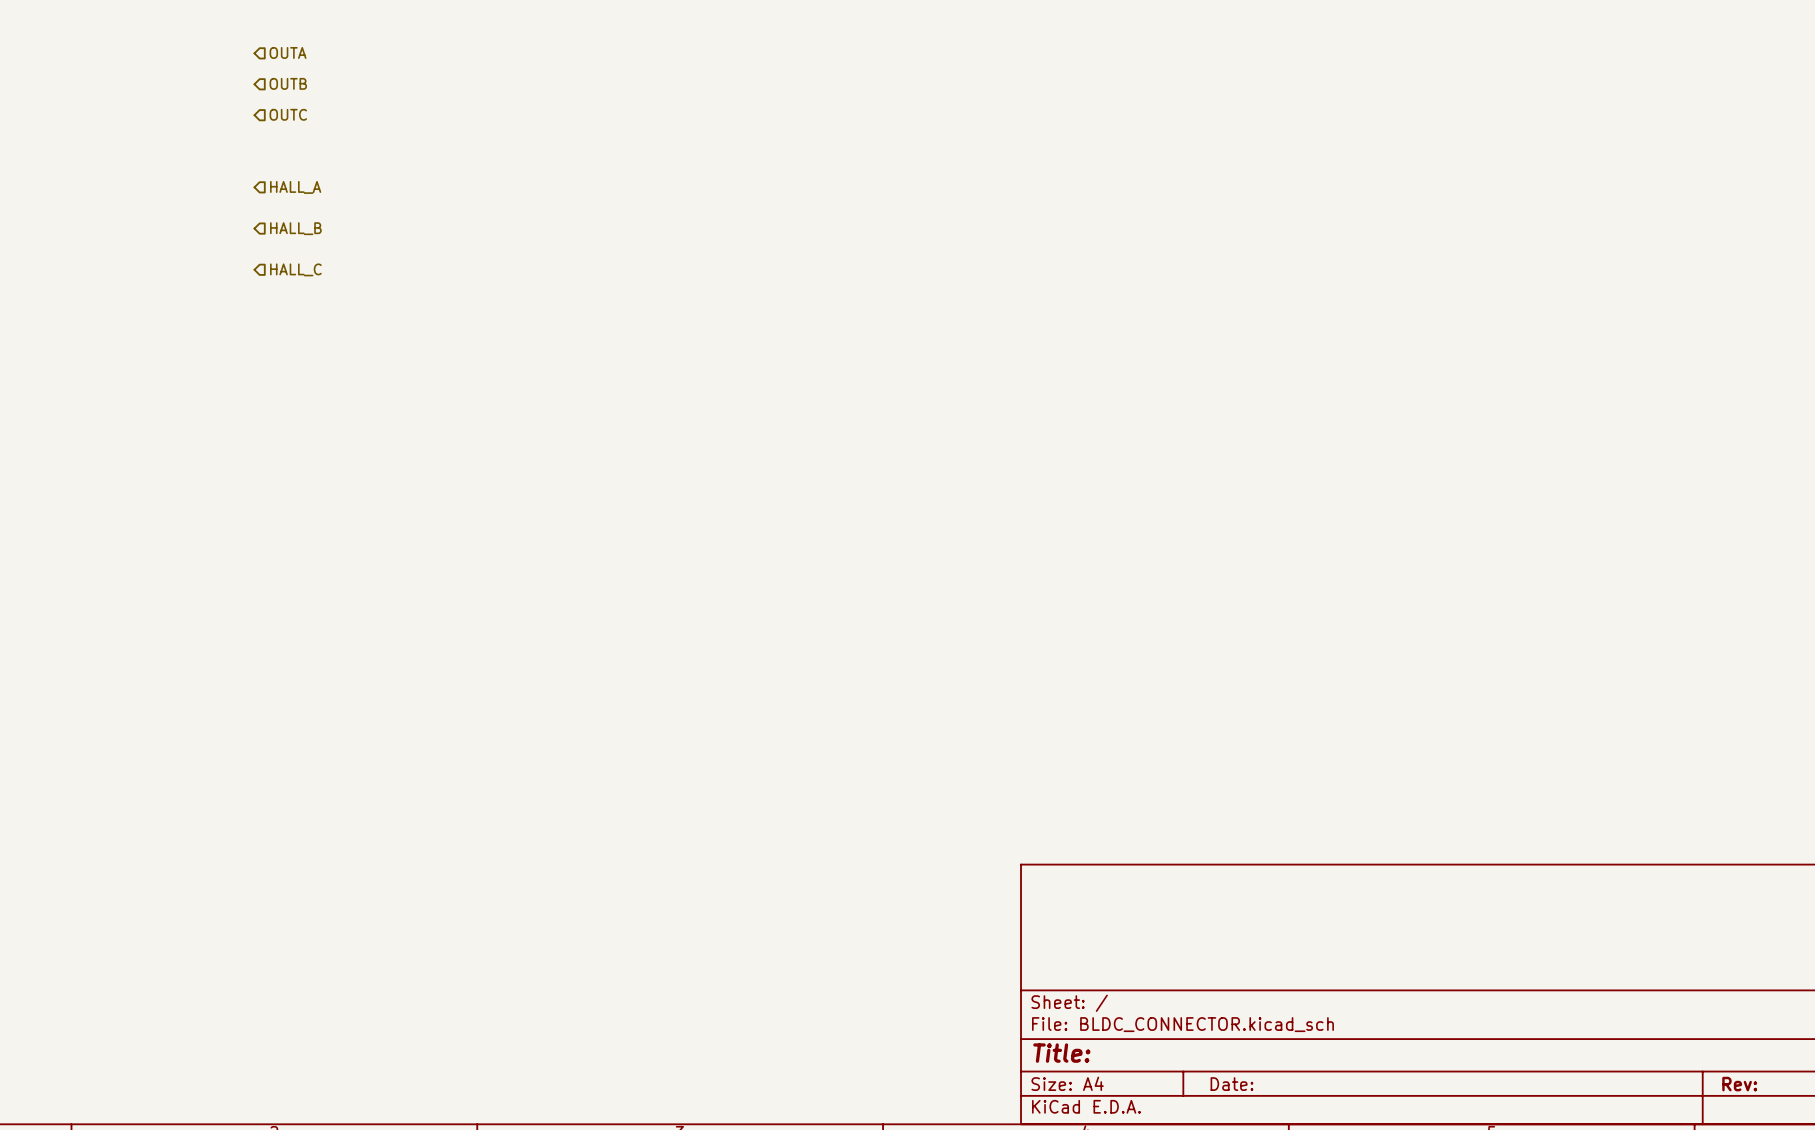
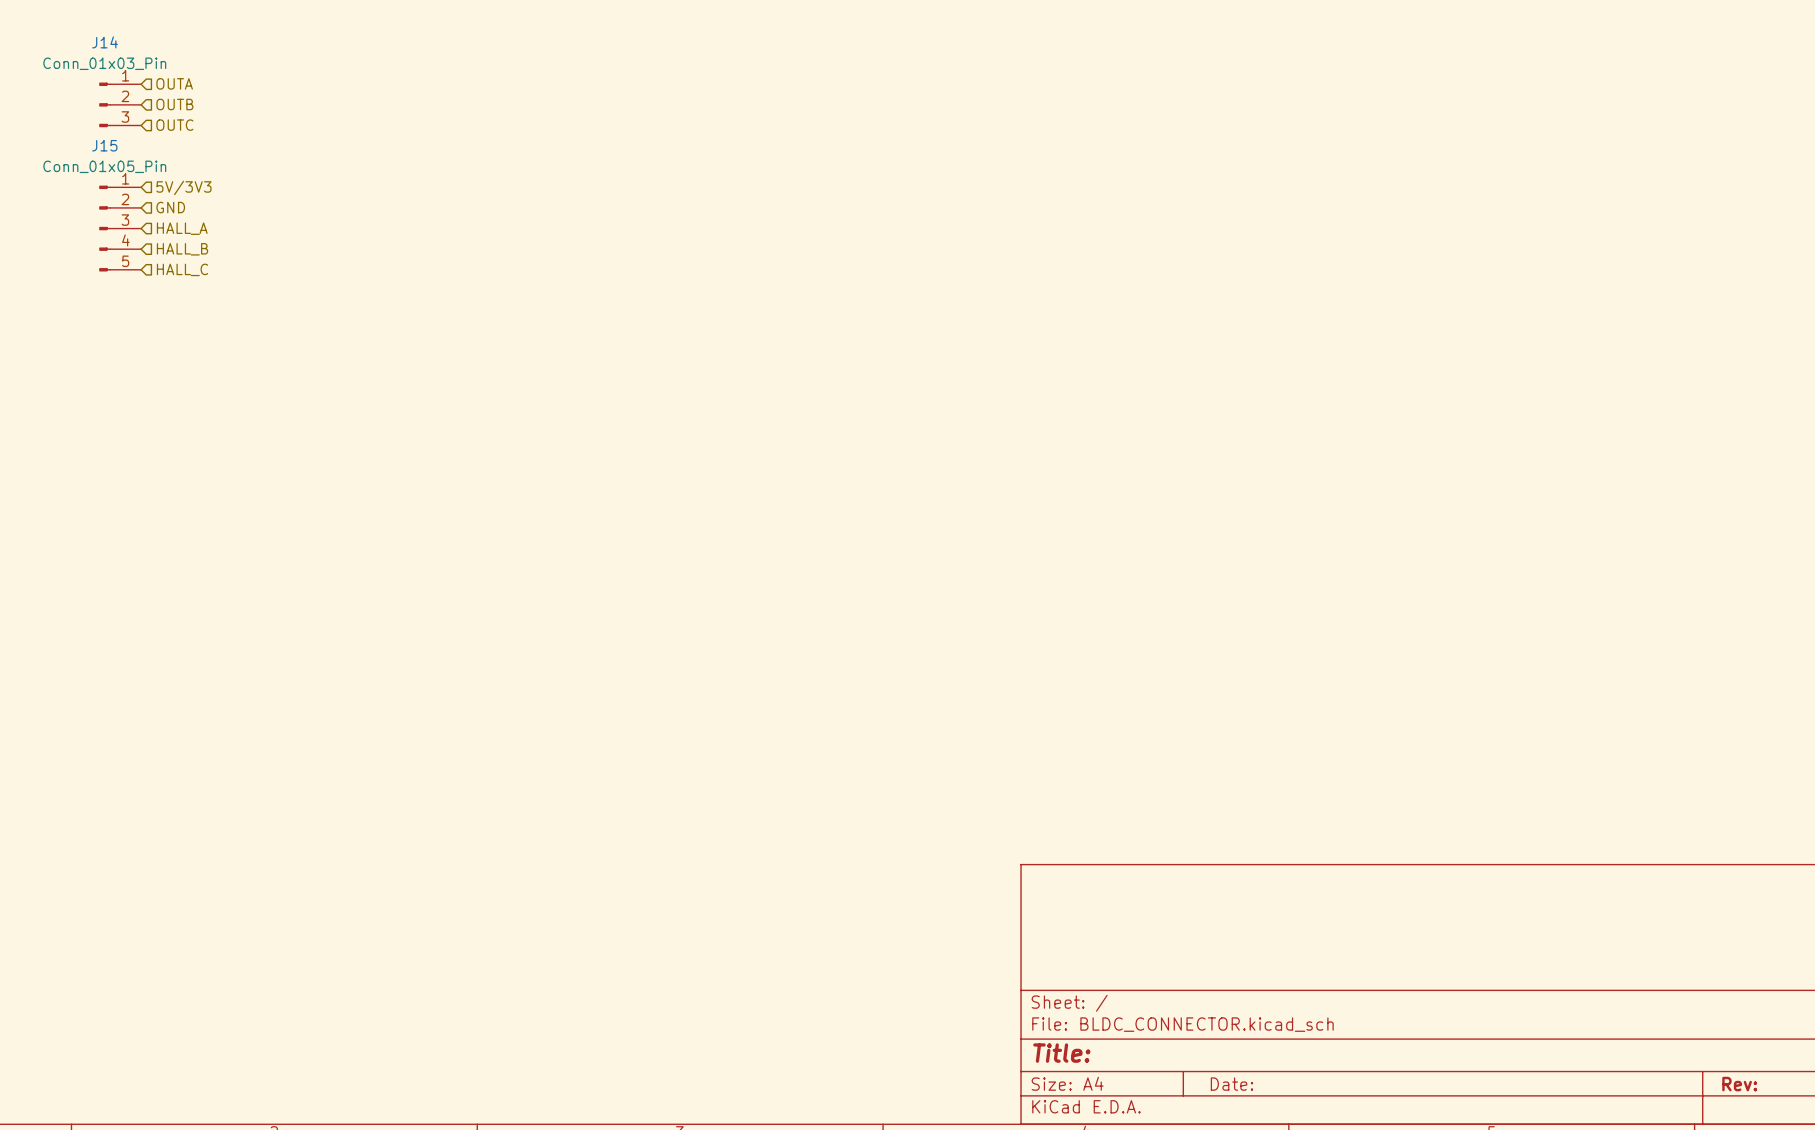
hierarchical label position: OUTA (288, 52) -> OUTA (174, 83)
hierarchical label position: OUTB (288, 83) -> OUTB (174, 104)
J14: none -> Conn_01x03_Pin (120, 104)
hierarchical label position: OUTC (288, 114) -> OUTC (174, 125)
hierarchical label: none -> 5V/3V3 (183, 187)
hierarchical label position: HALL_A (295, 187) -> HALL_A (182, 228)
hierarchical label: none -> GND (170, 207)
J15: none -> Conn_01x05_Pin (120, 228)
hierarchical label position: HALL_B (295, 228) -> HALL_B (182, 249)
hierarchical label position: HALL_C (295, 269) -> HALL_C (182, 269)

